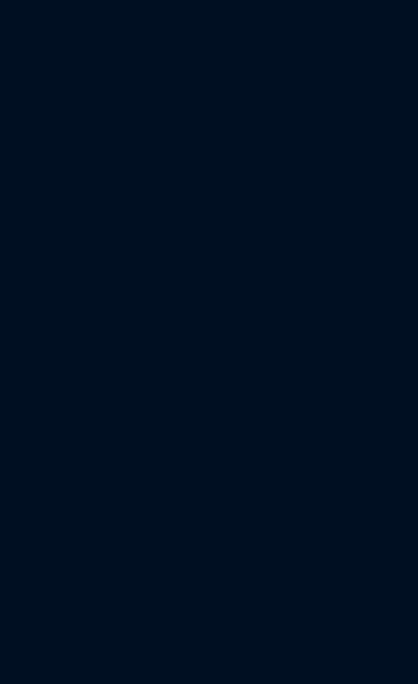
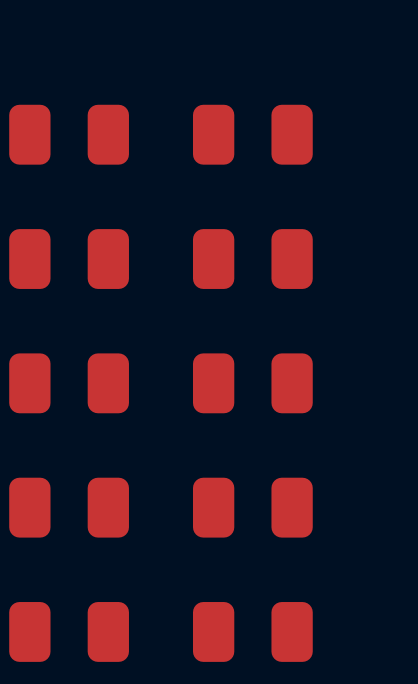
part: none -> (69, 134)
part: none -> (252, 134)
part: none -> (69, 259)
part: none -> (252, 259)
part: none -> (69, 383)
part: none -> (252, 383)
part: none -> (69, 507)
part: none -> (252, 507)
part: none -> (69, 631)
part: none -> (252, 631)

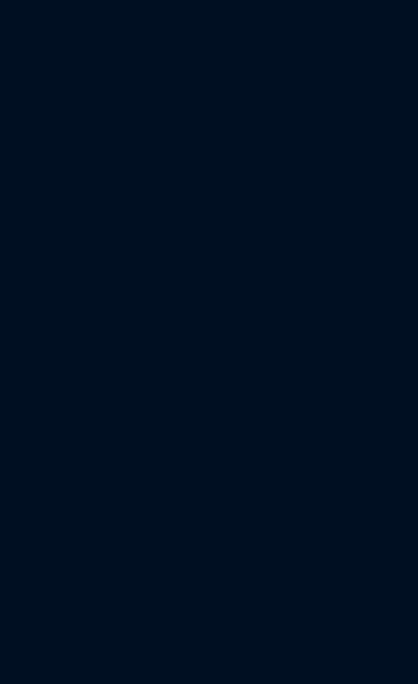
part: (69, 134) -> none
part: (252, 134) -> none
part: (69, 259) -> none
part: (252, 259) -> none
part: (69, 383) -> none
part: (252, 383) -> none
part: (69, 507) -> none
part: (252, 507) -> none
part: (69, 631) -> none
part: (252, 631) -> none

